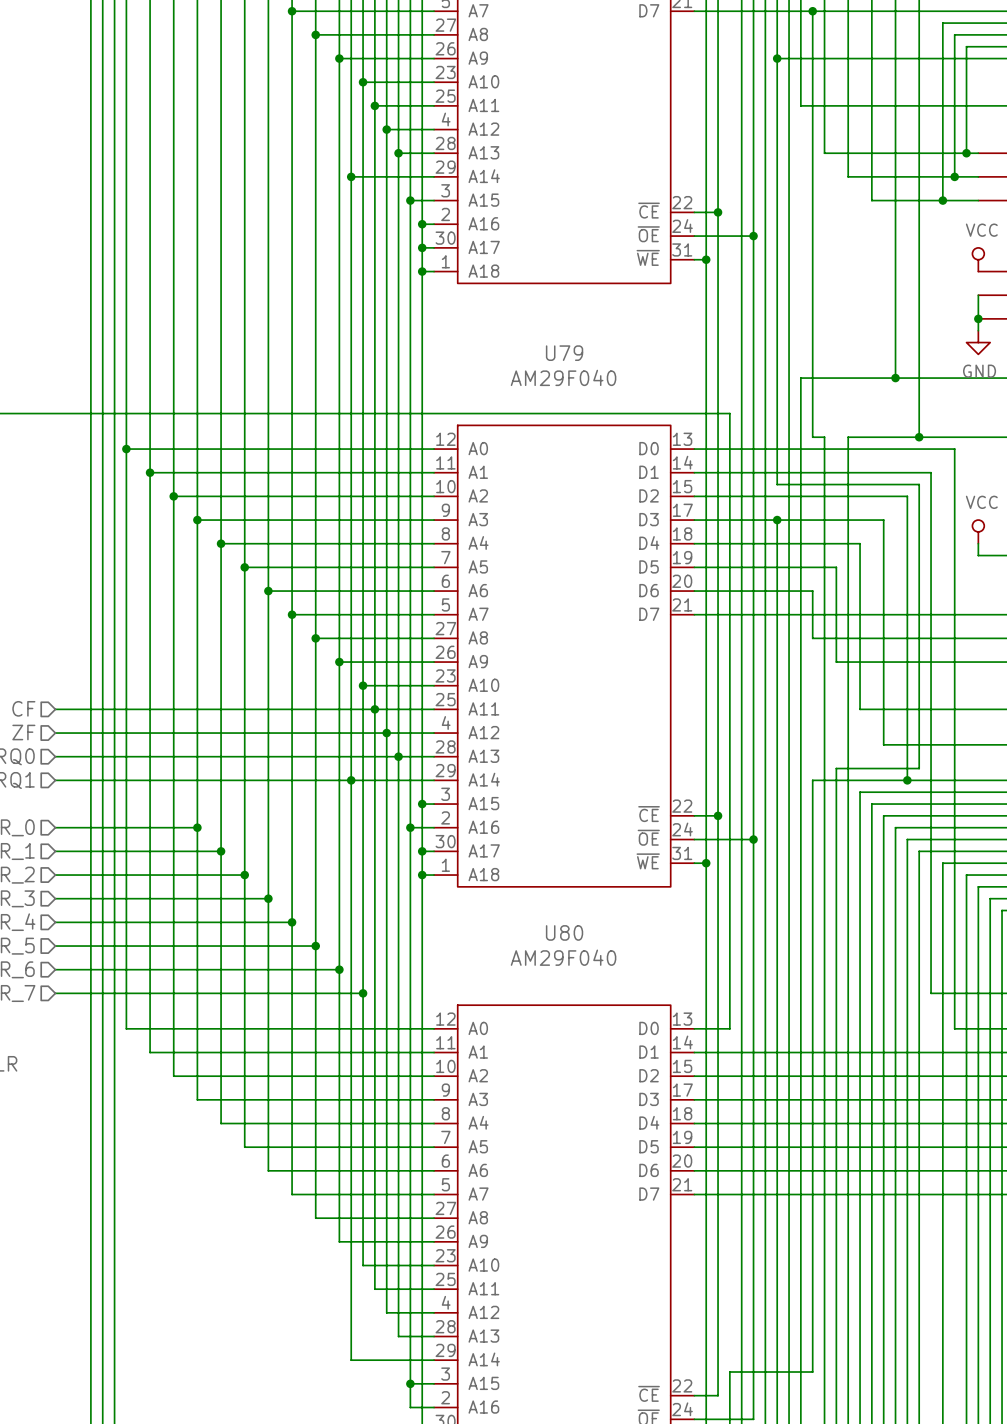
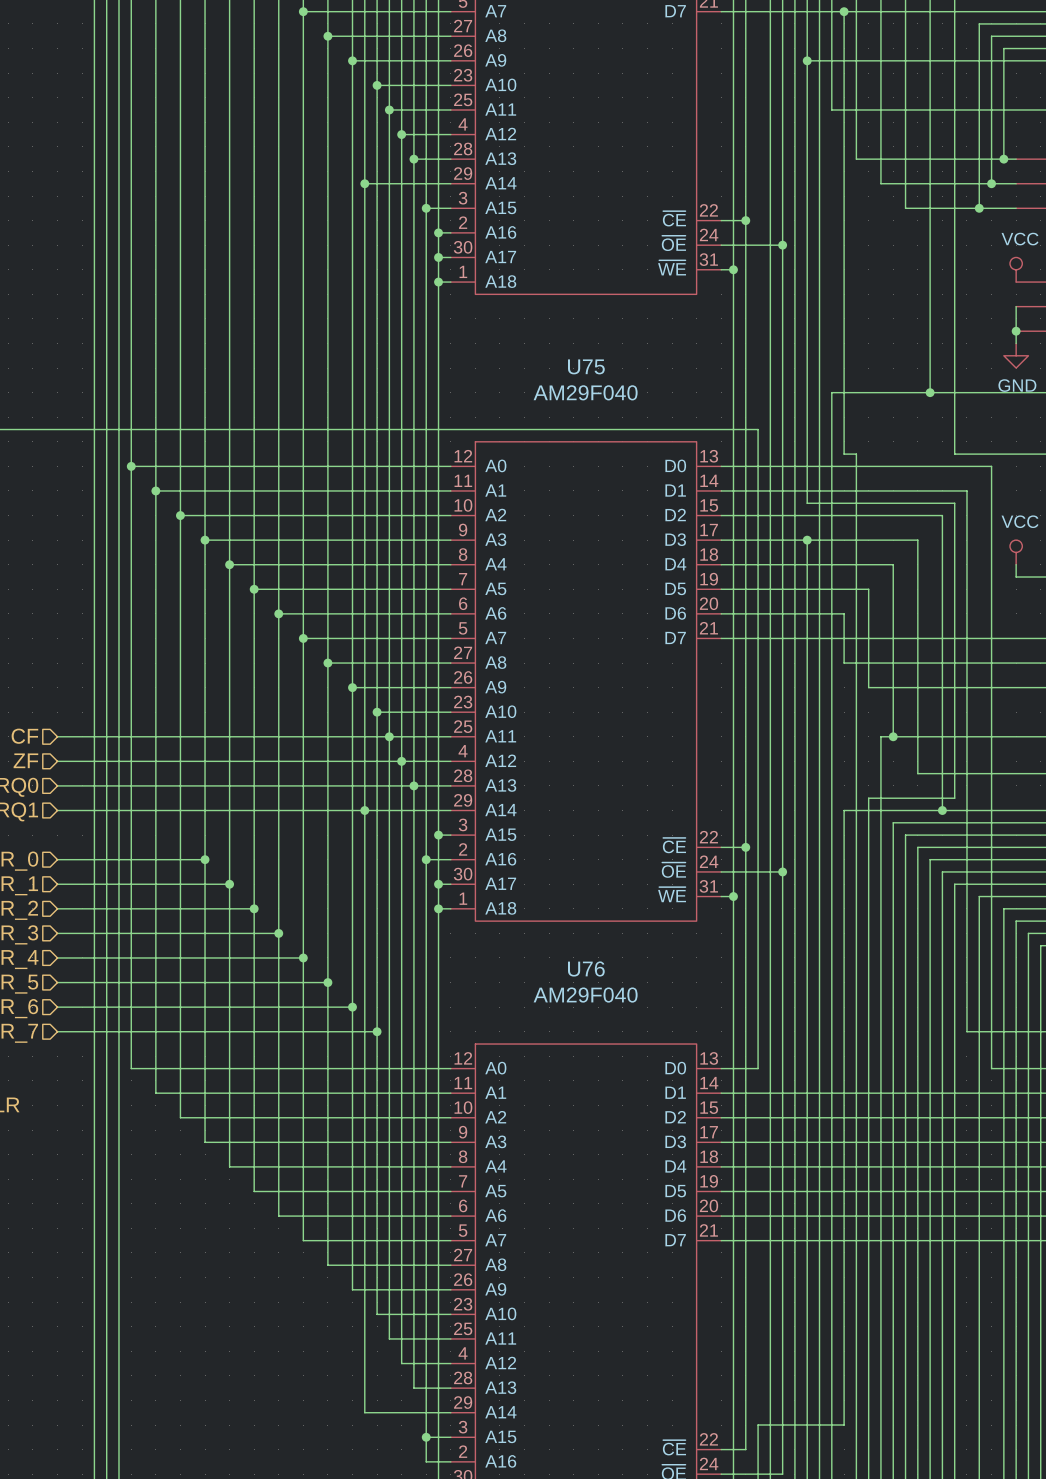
U79 name: U79 (564, 353) -> U75 (586, 366)
wire: (919, 437) (848, 437) (848, 709) -> (893, 736) (880, 736)
junction: (919, 437) -> none
junction: none -> (893, 736)
U80 name: U80 (564, 932) -> U76 (586, 968)

